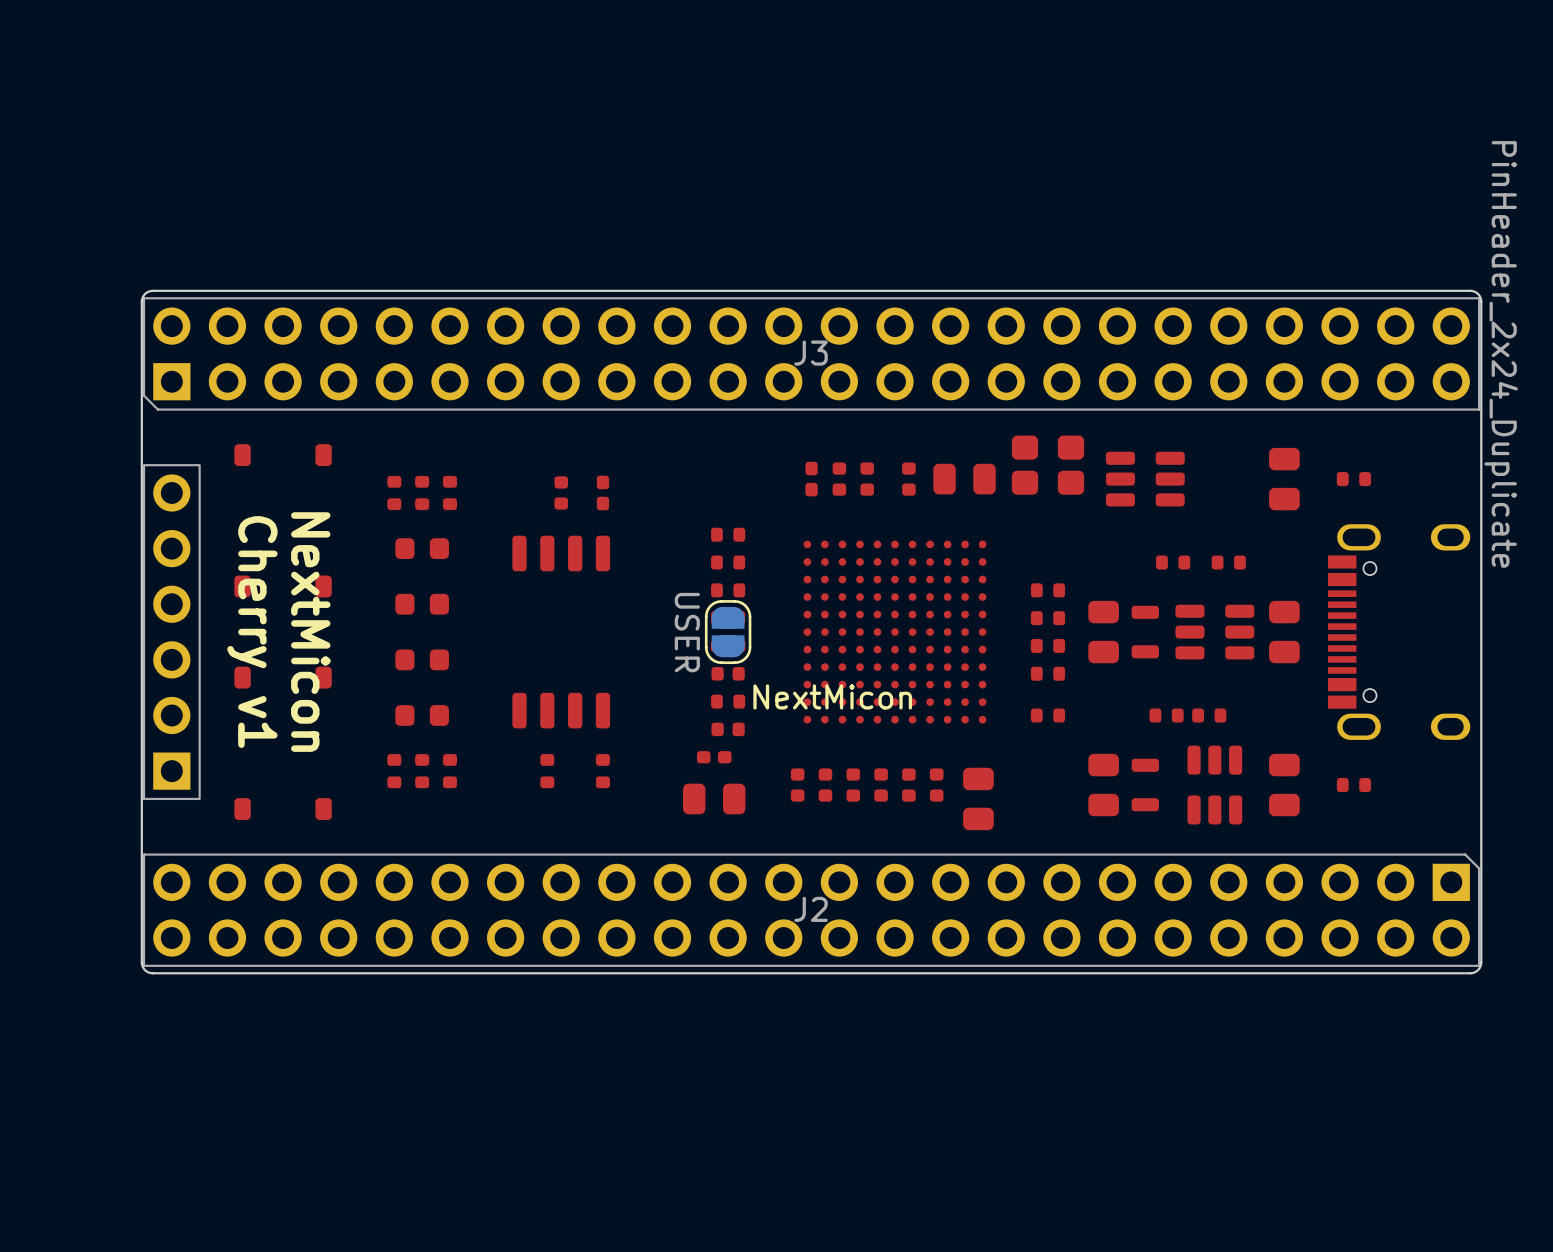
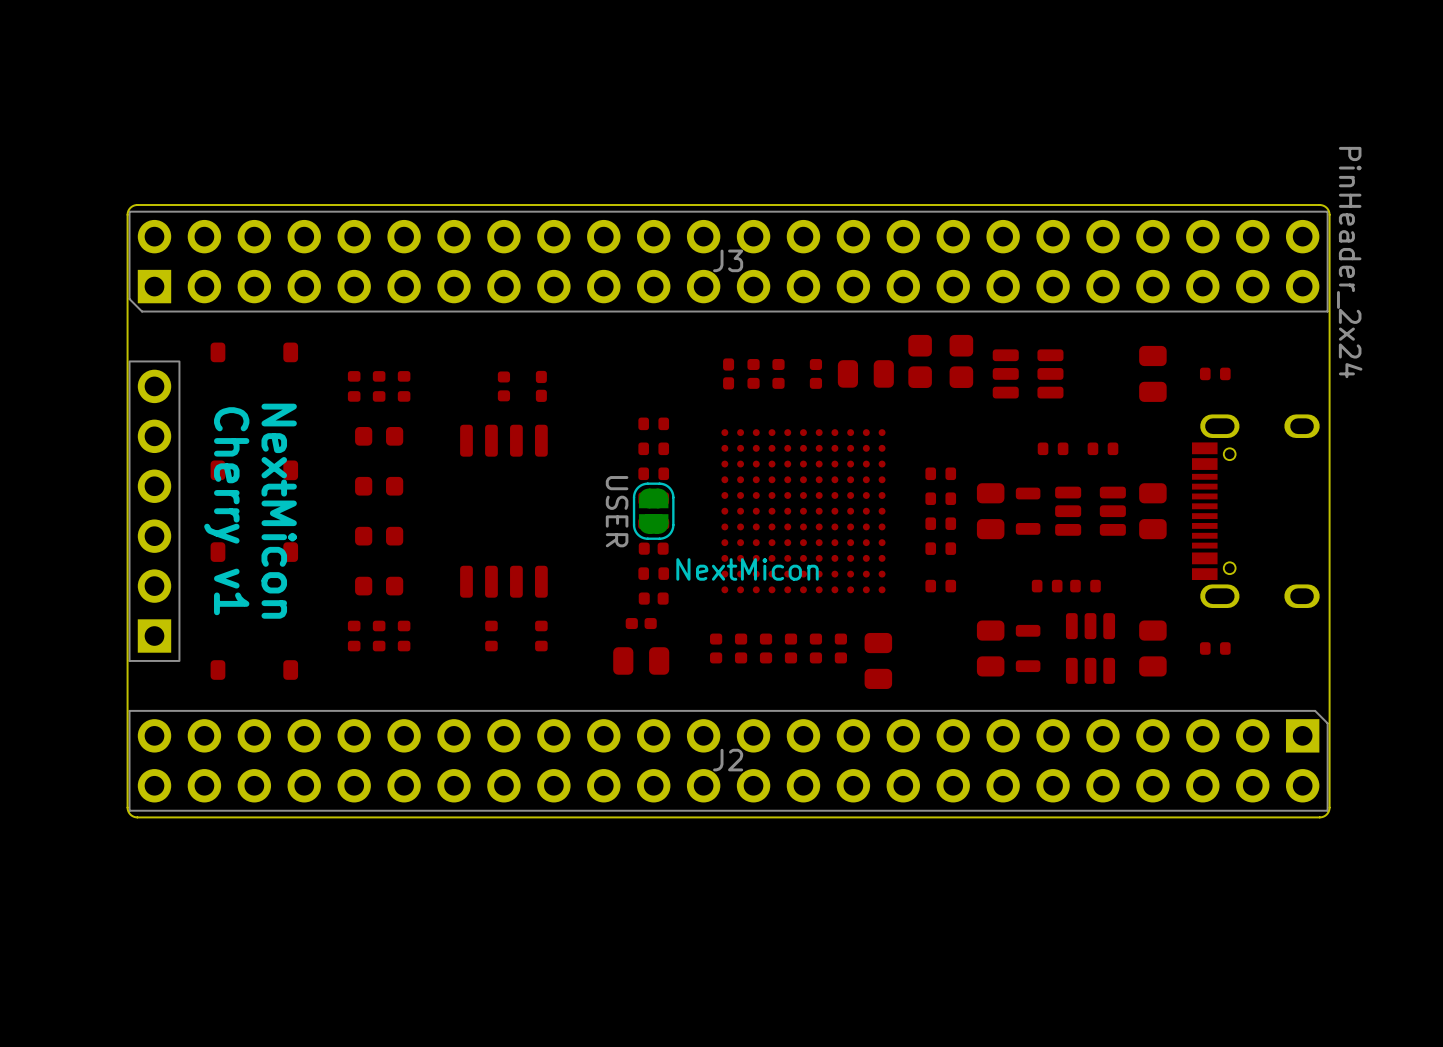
J3 value: PinHeader_2x24_Duplicate (1501, 354) -> PinHeader_2x24 (1349, 262)

